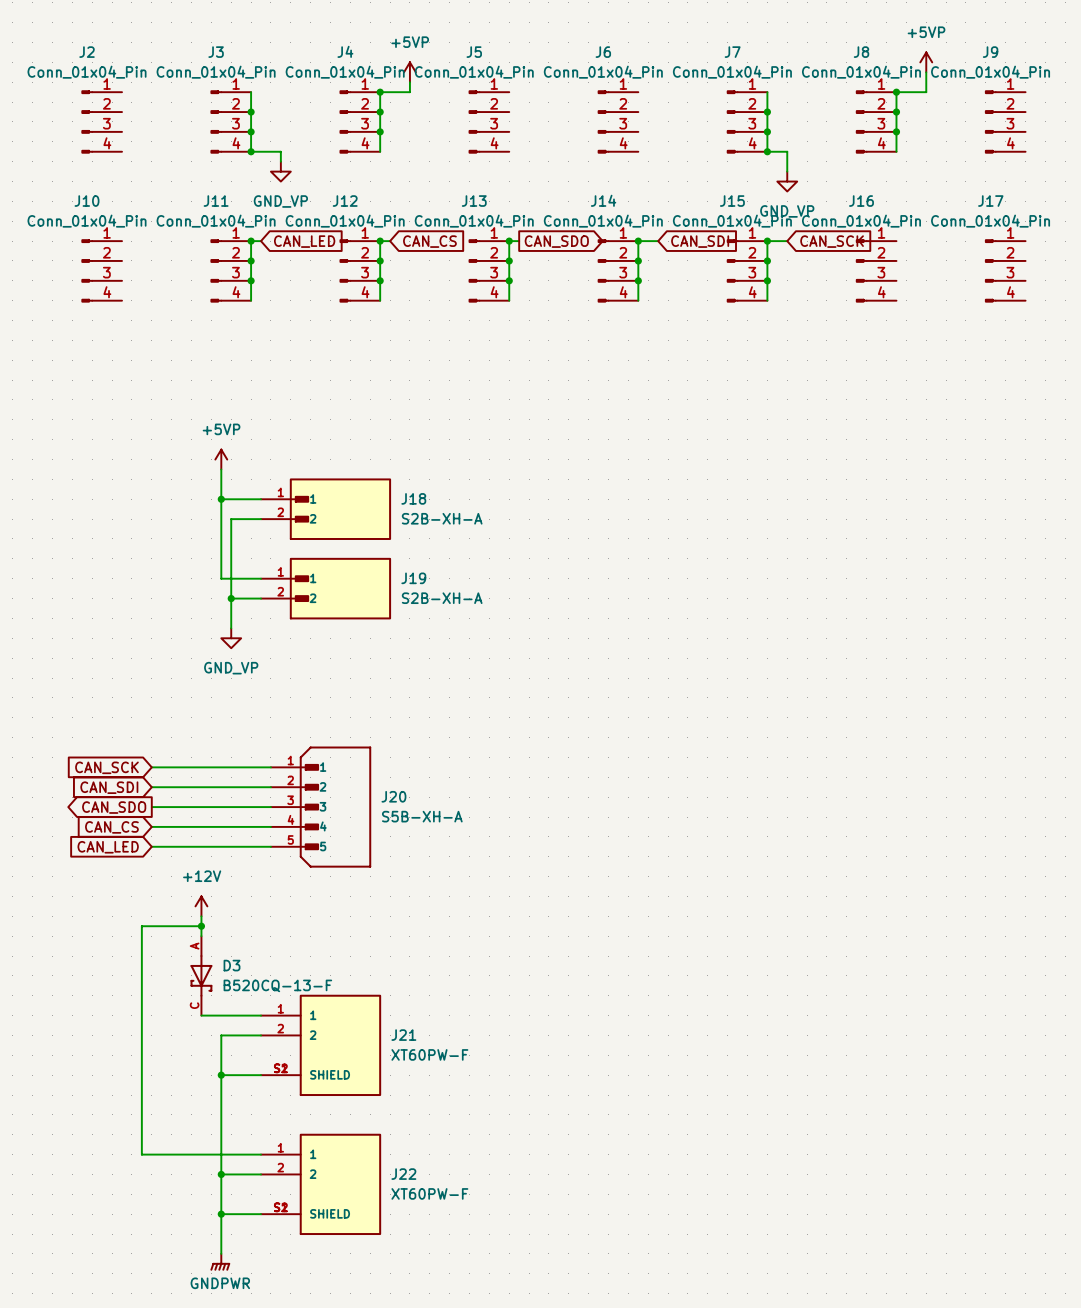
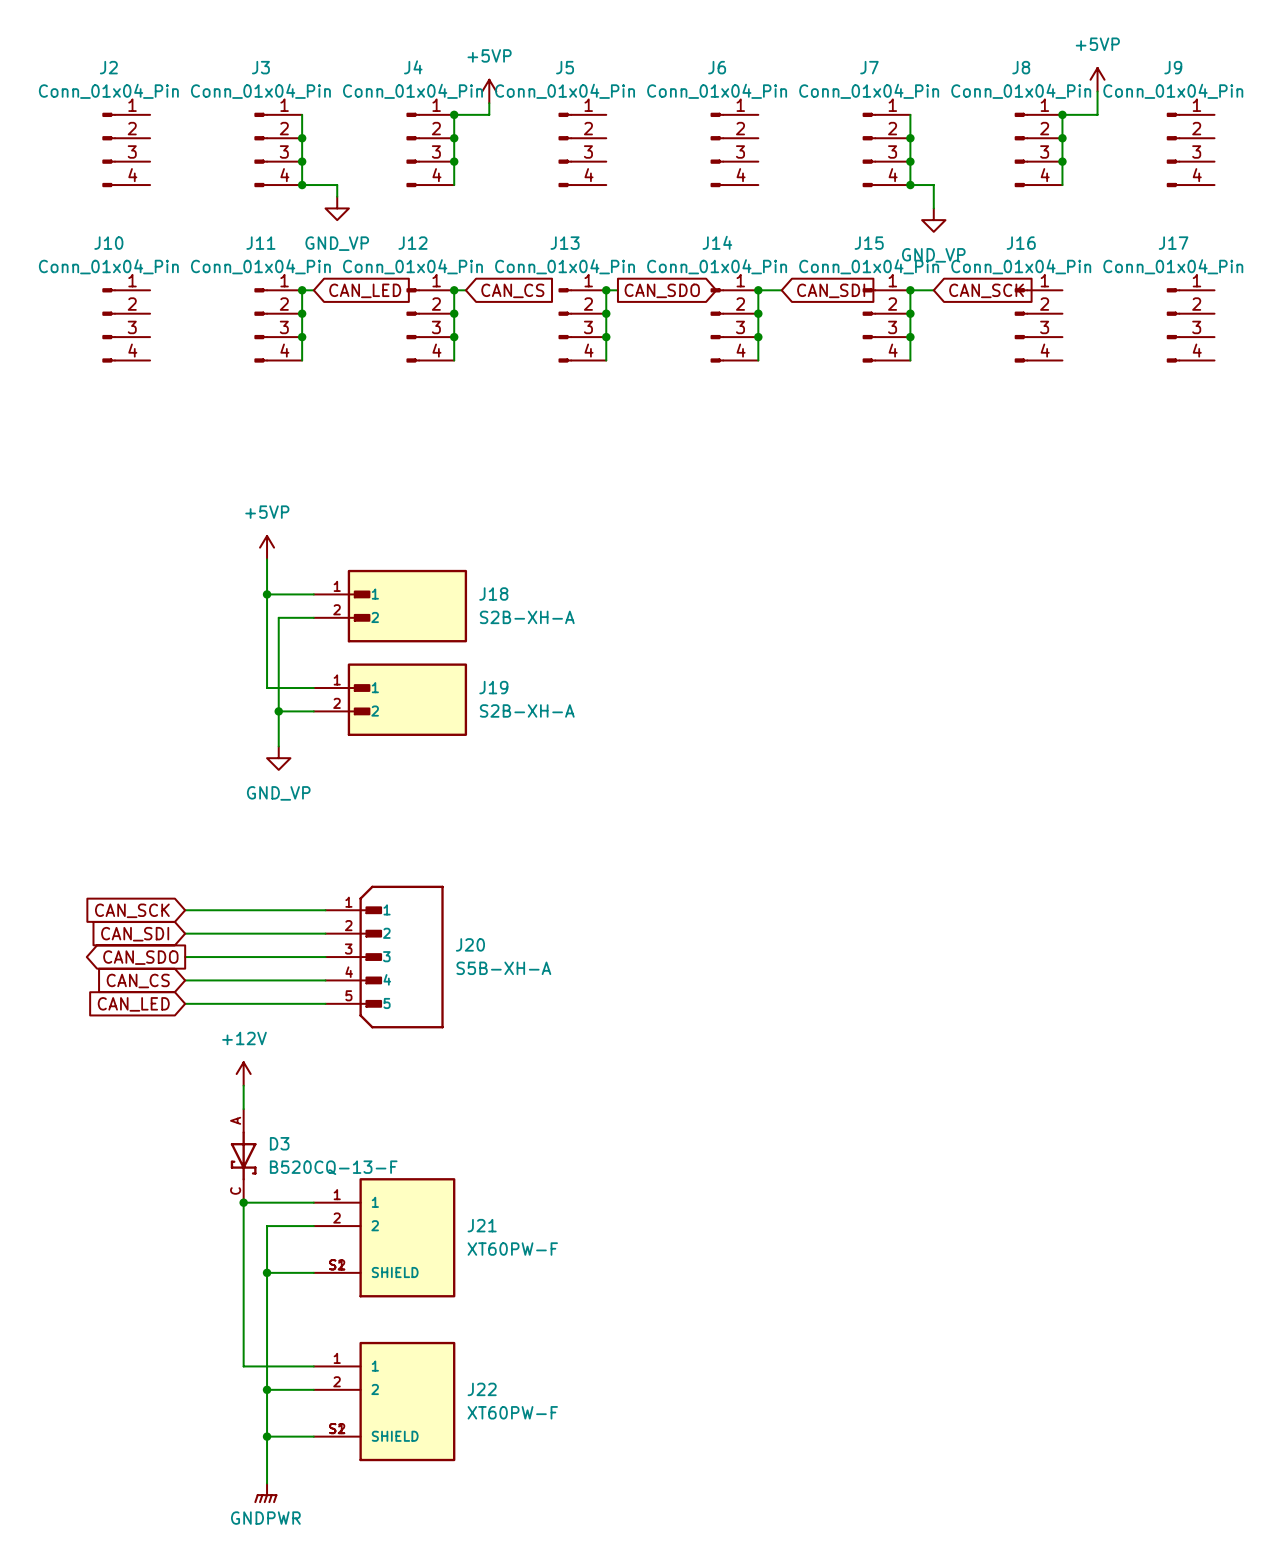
wire: (201, 926) (141, 926) (141, 1154) (201, 1154) -> (243, 1202) (243, 1366)
junction: (201, 926) -> none
junction: none -> (243, 1202)

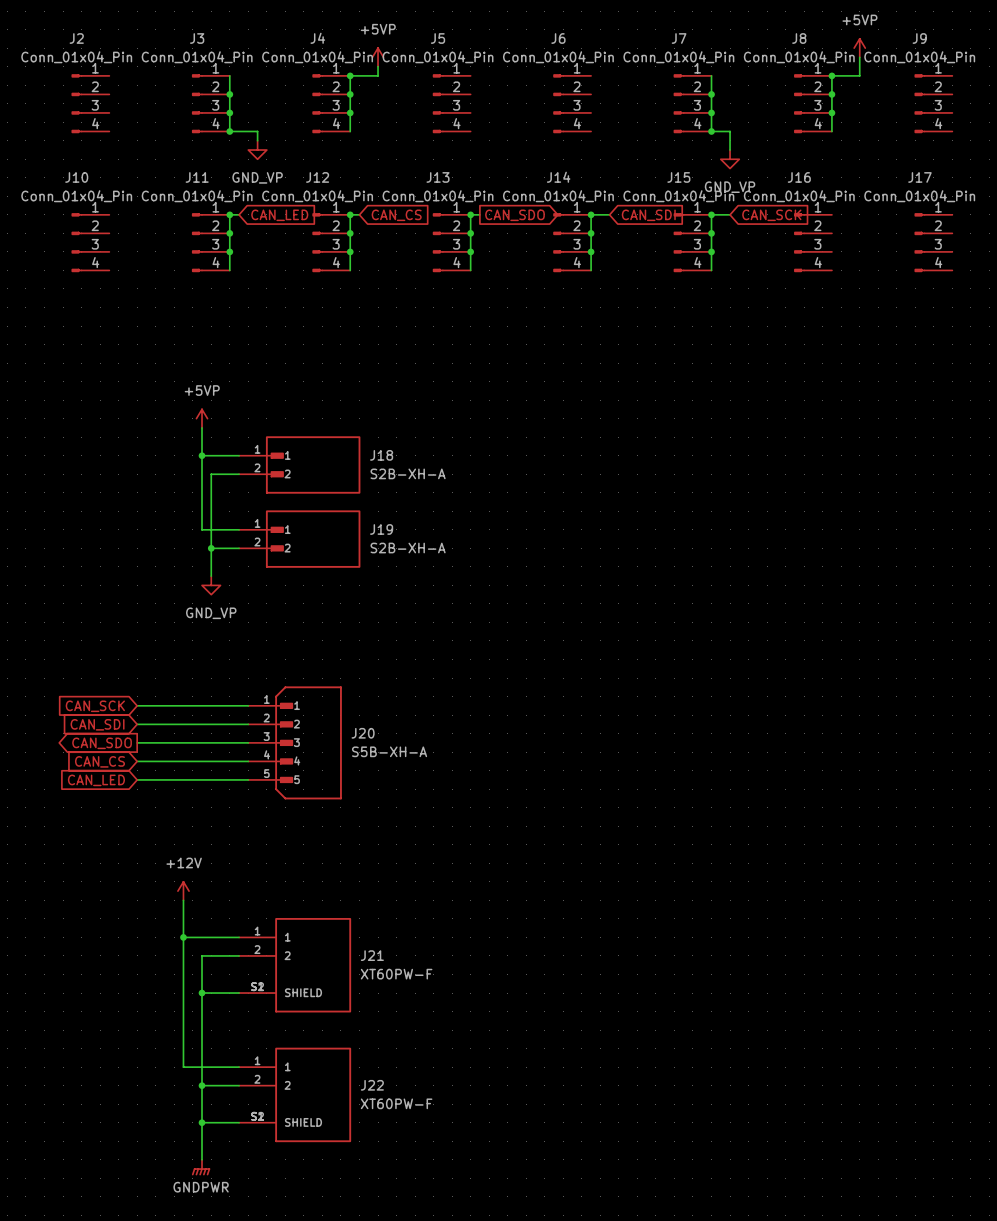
power symbol position: +12V (243, 1074) -> +12V (183, 891)
wire: (243, 1085) (243, 1109) -> none
D3: B520CQ-13-F (243, 1155) -> none

